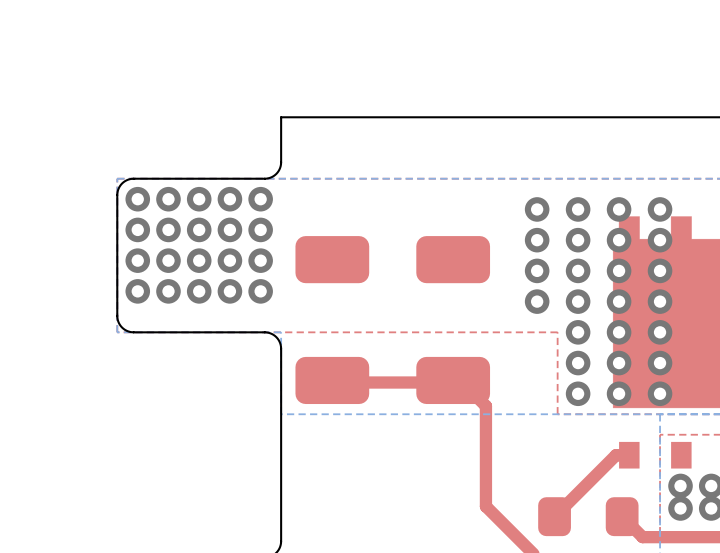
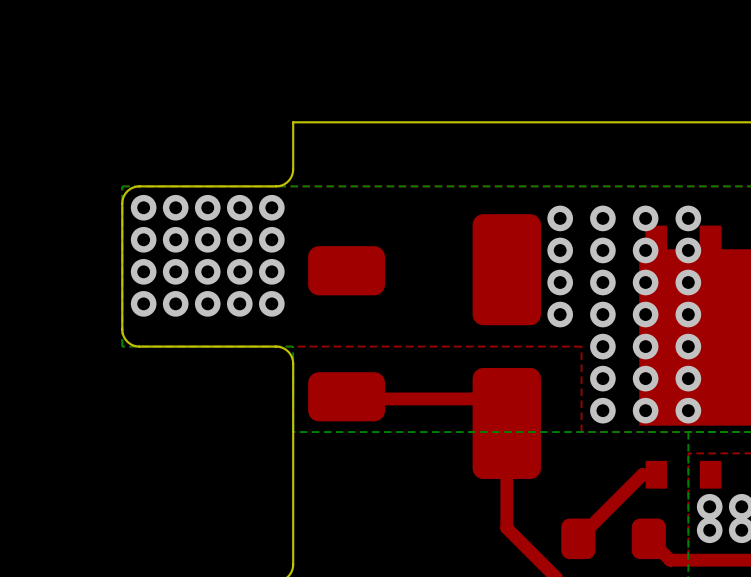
part footprint: [416, 236, 491, 405] -> [472, 214, 541, 480]

